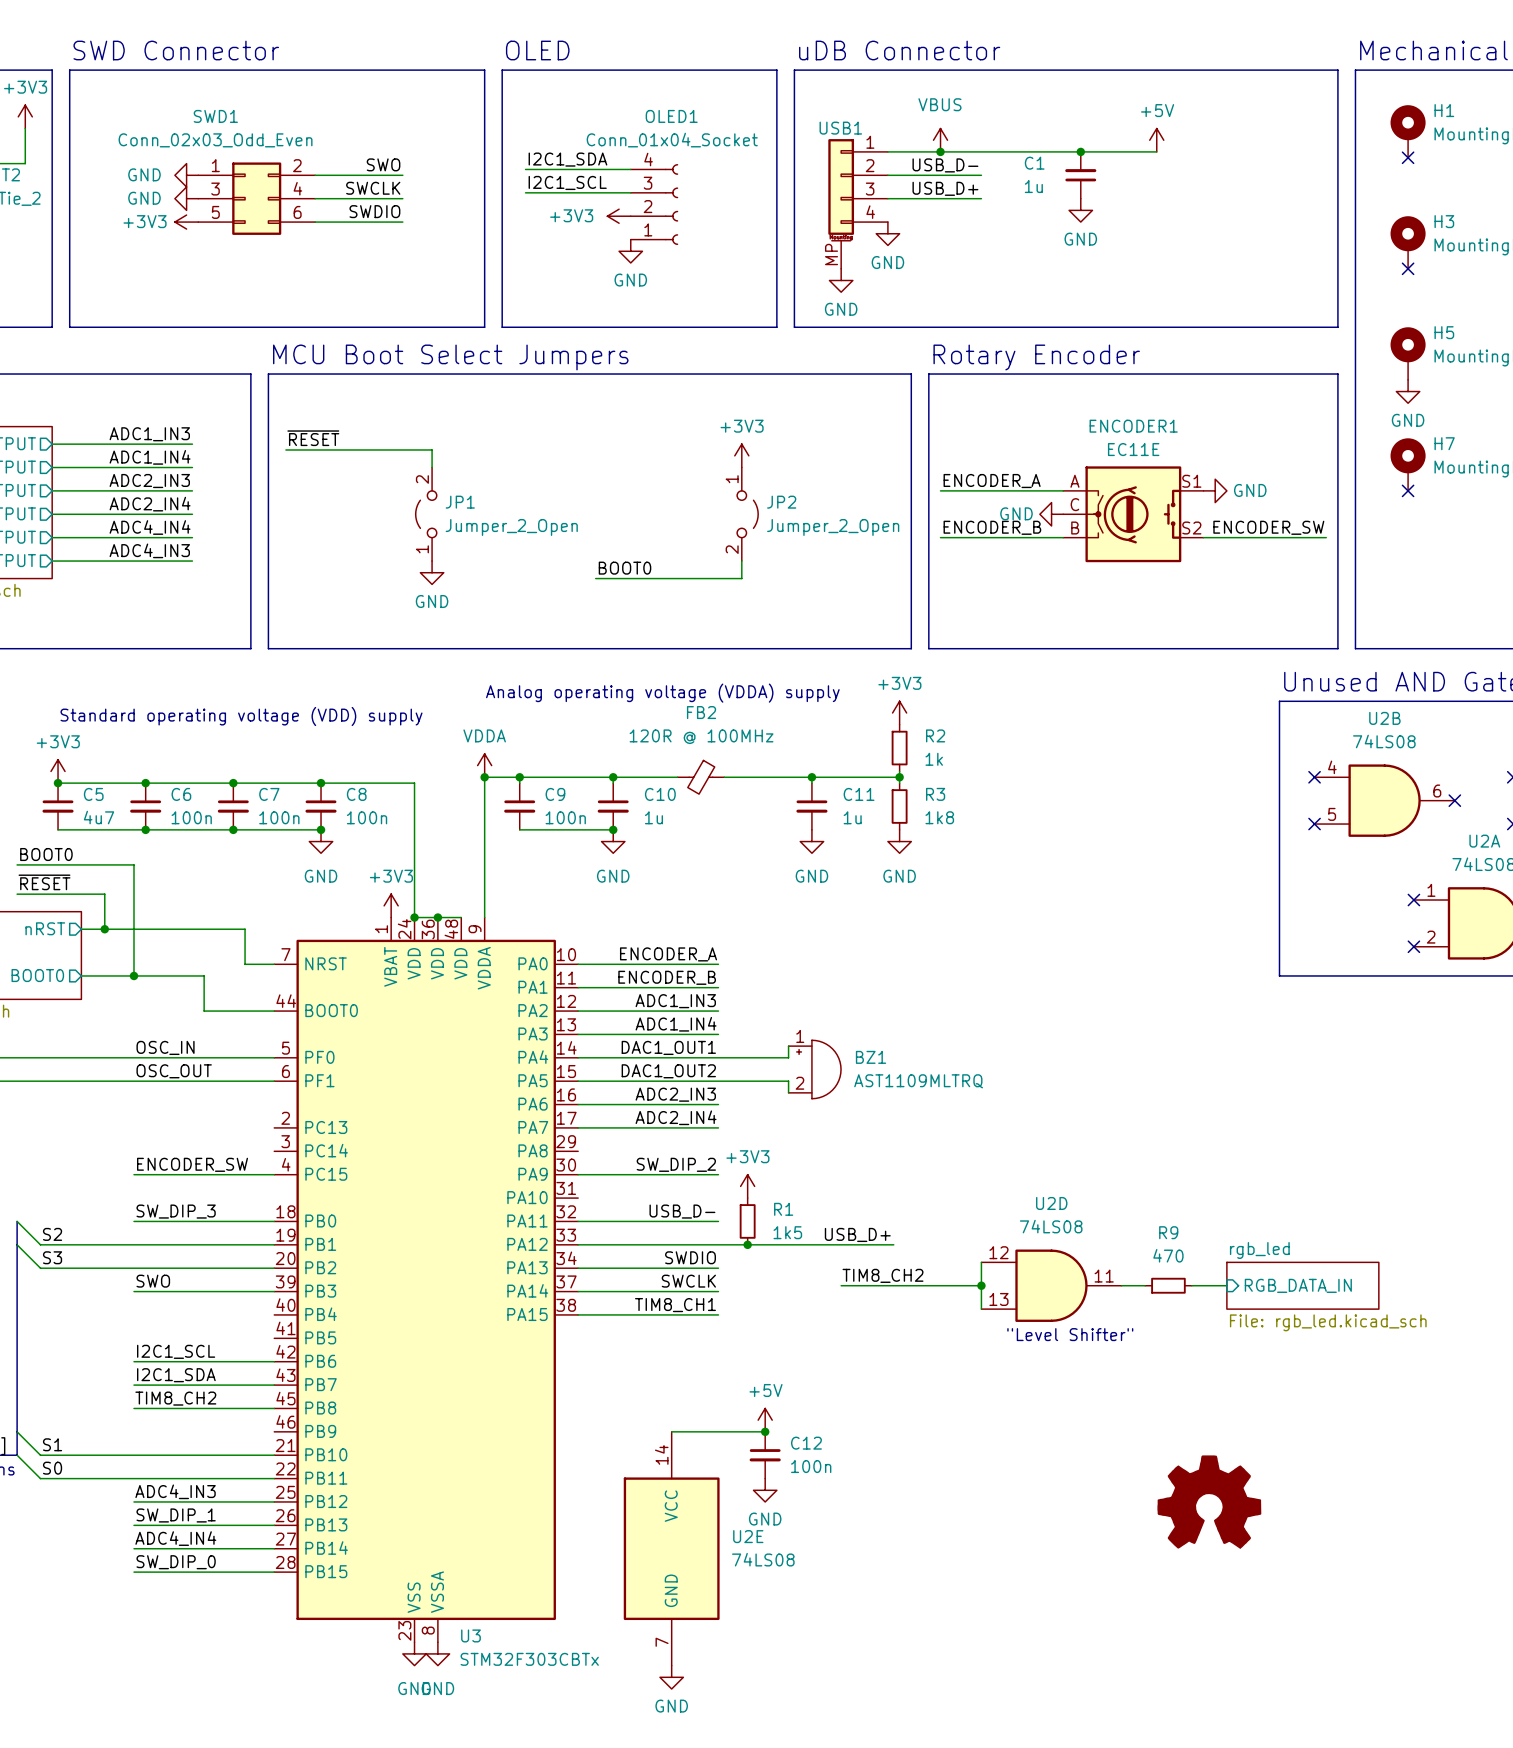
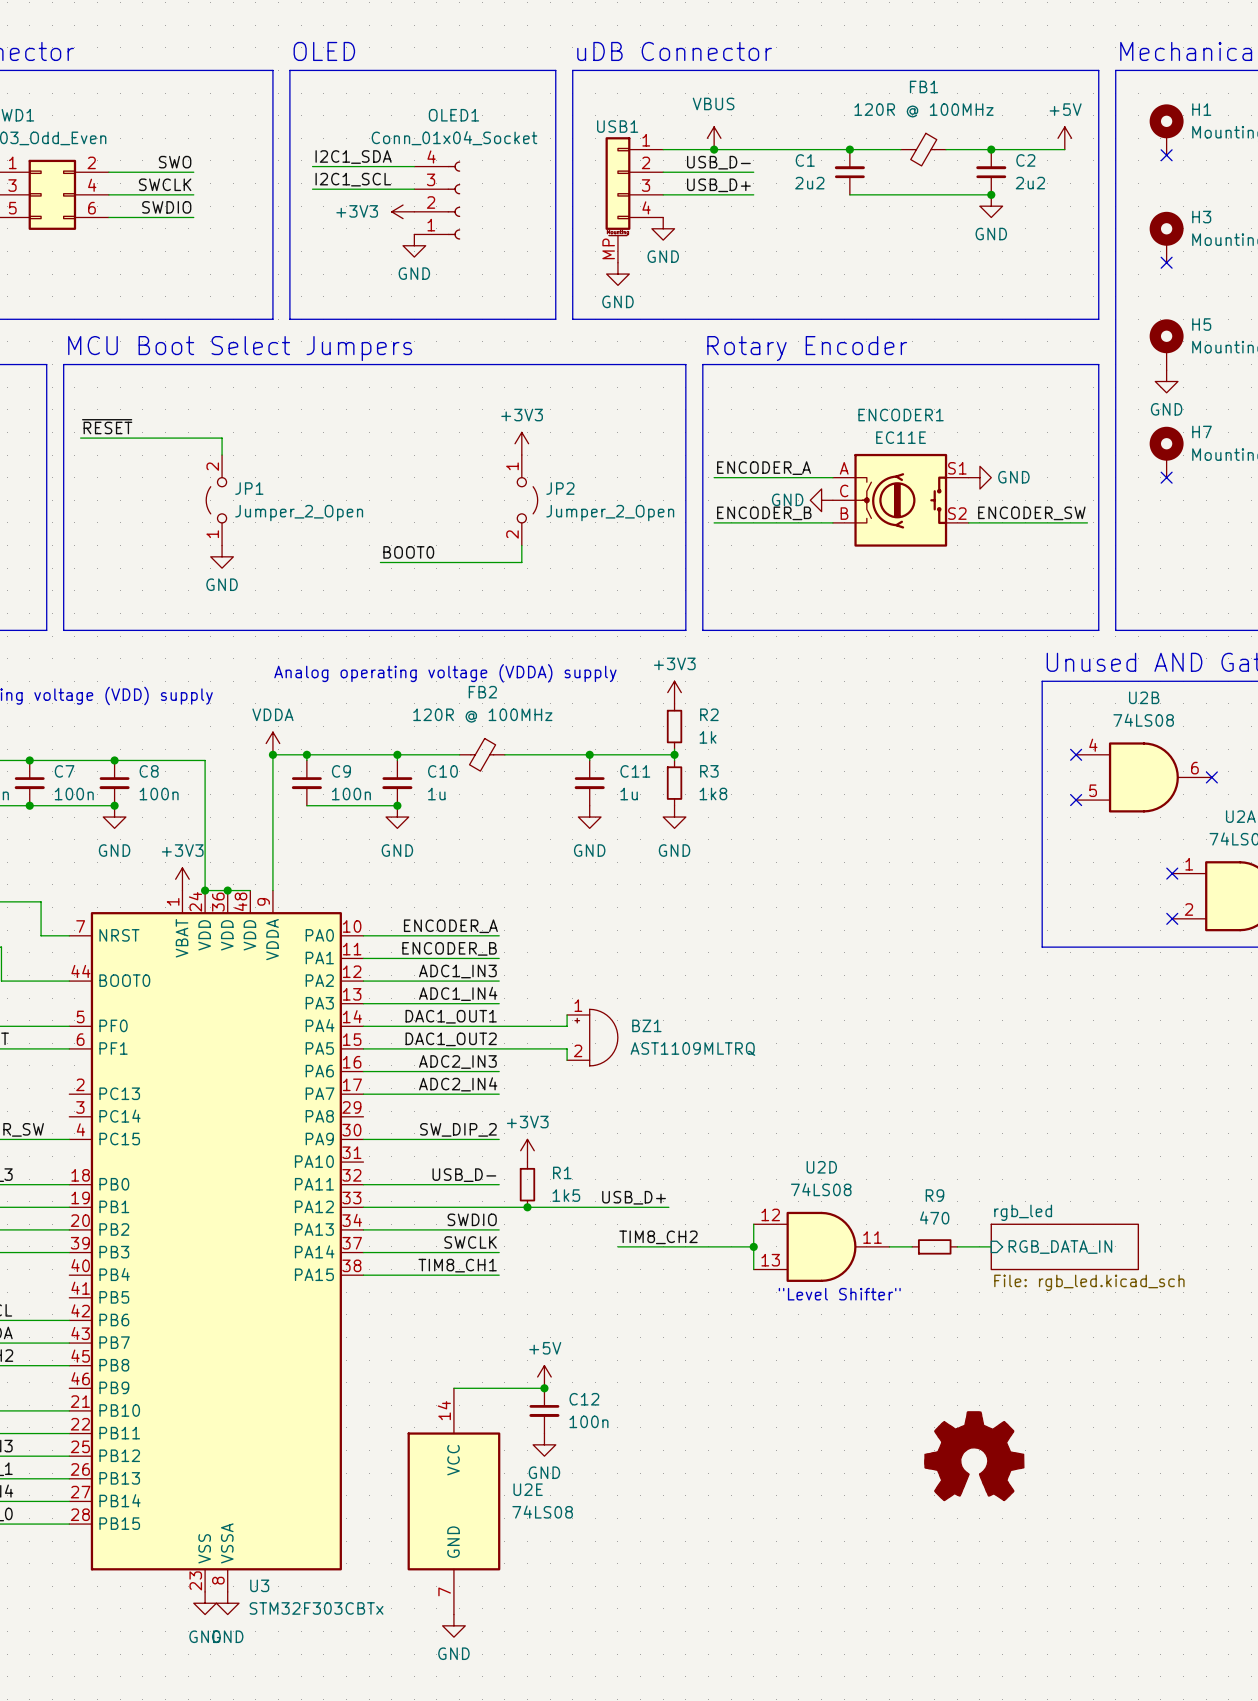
power symbol position: +5V (1156, 140) -> +5V (1064, 138)
FB1: none -> 120R @ 100MHz (923, 149)
wire: none -> (946, 149) (1064, 149)
junction: none -> (991, 149)
C2: none -> 2u2 (991, 172)
C1 value: 1u (1033, 186) -> 2u2 (809, 183)
wire: none -> (849, 194) (991, 194)
junction: none -> (991, 194)
power symbol position: GND (1080, 210) -> GND (991, 206)

